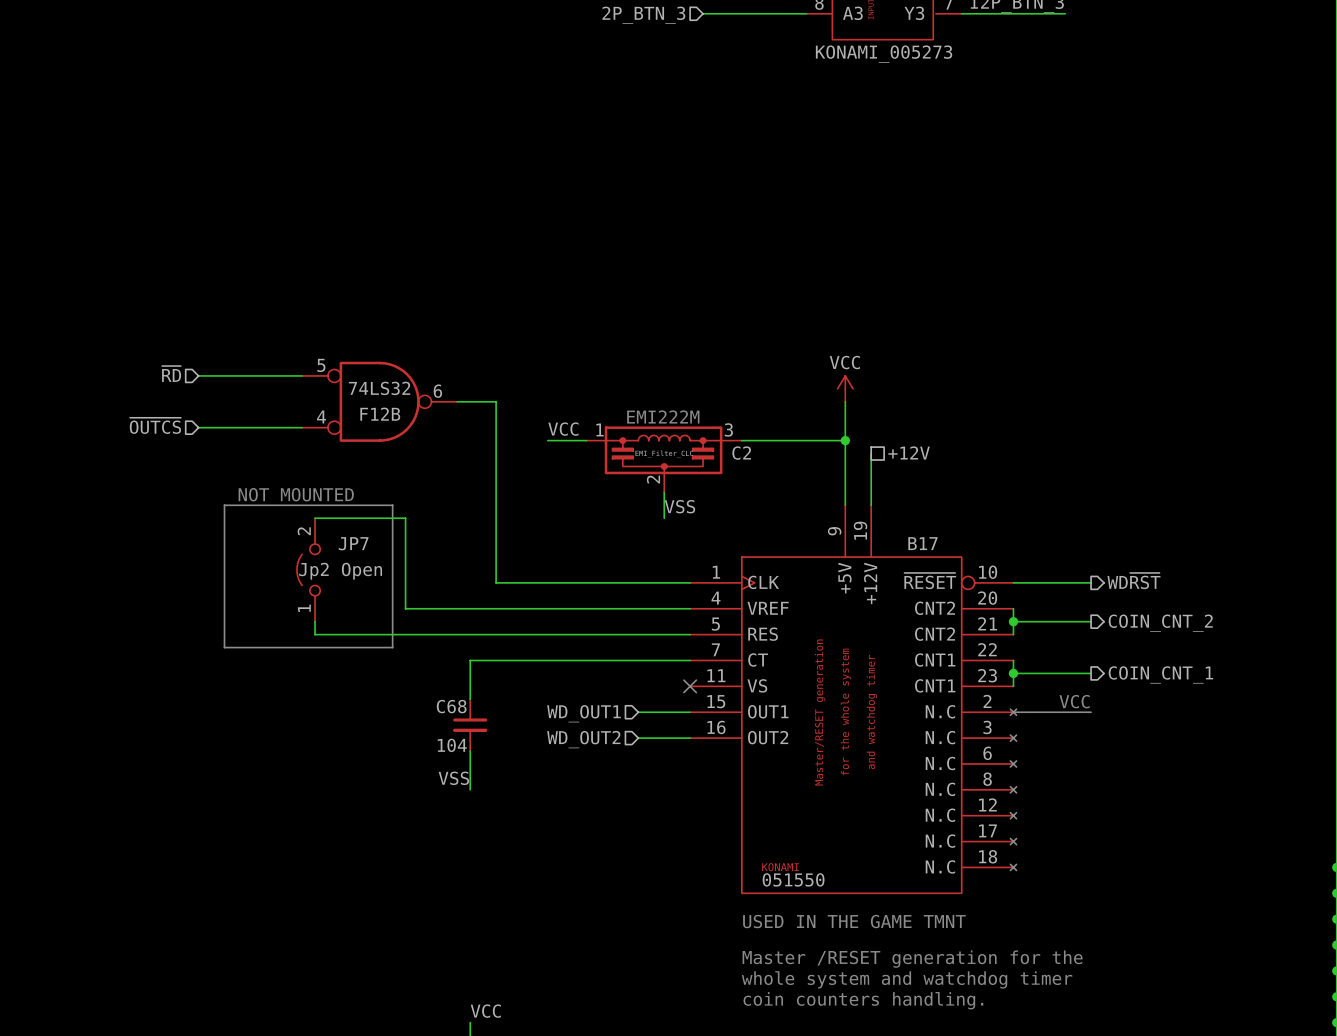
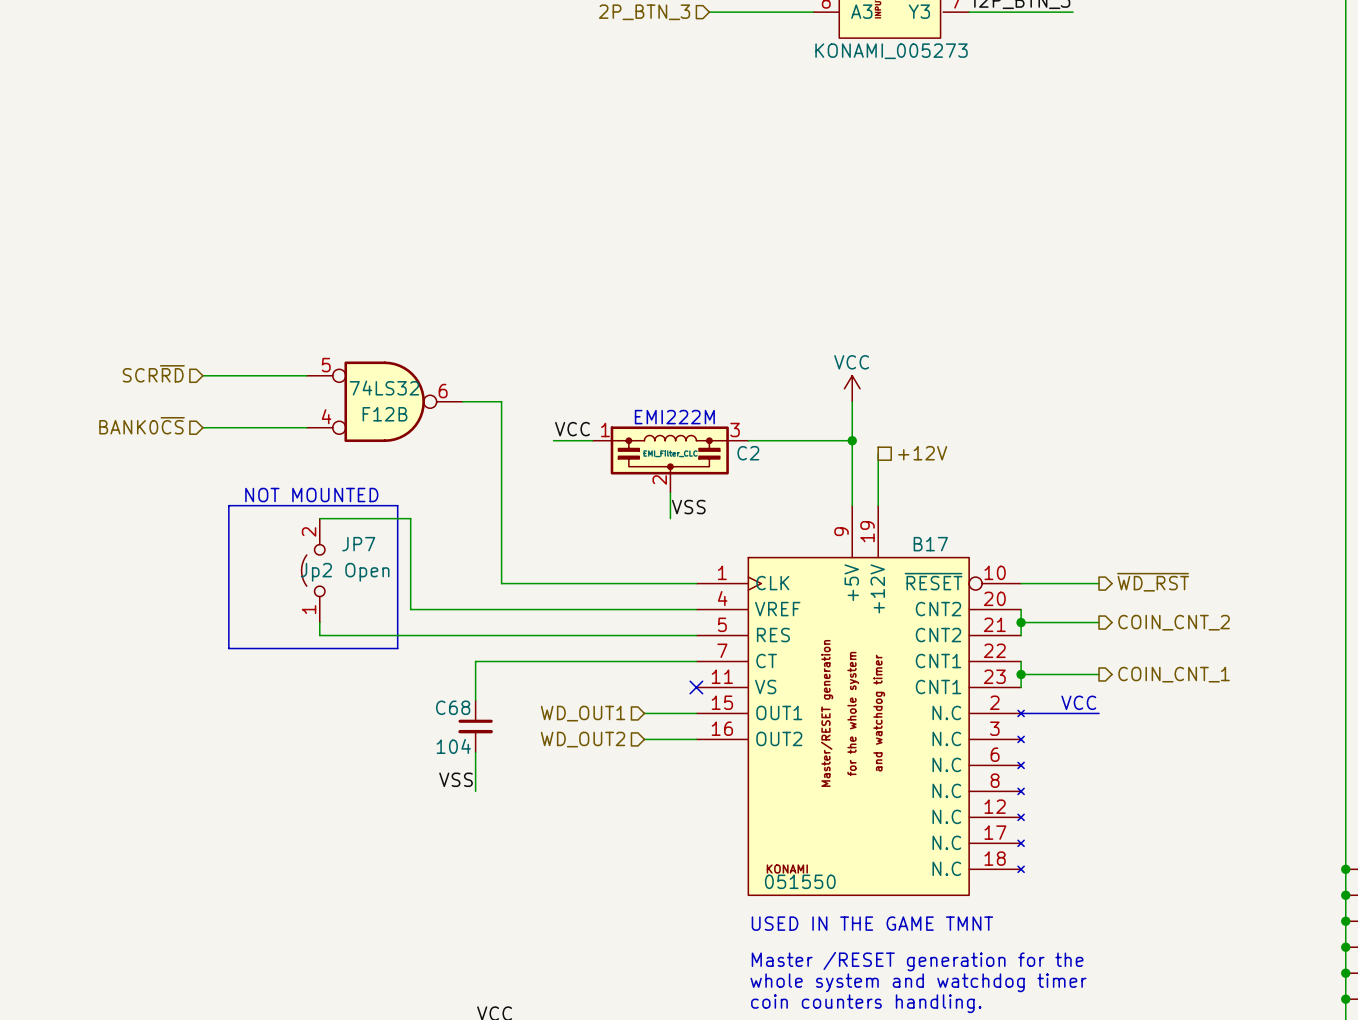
hierarchical label: ~{RD} (171, 373) -> SCR~{RD} (153, 373)
hierarchical label: ~{OUTCS} (155, 425) -> BANK0~{CS} (142, 425)
hierarchical label: WD~{RST} (1133, 581) -> ~{WD_RST} (1153, 582)

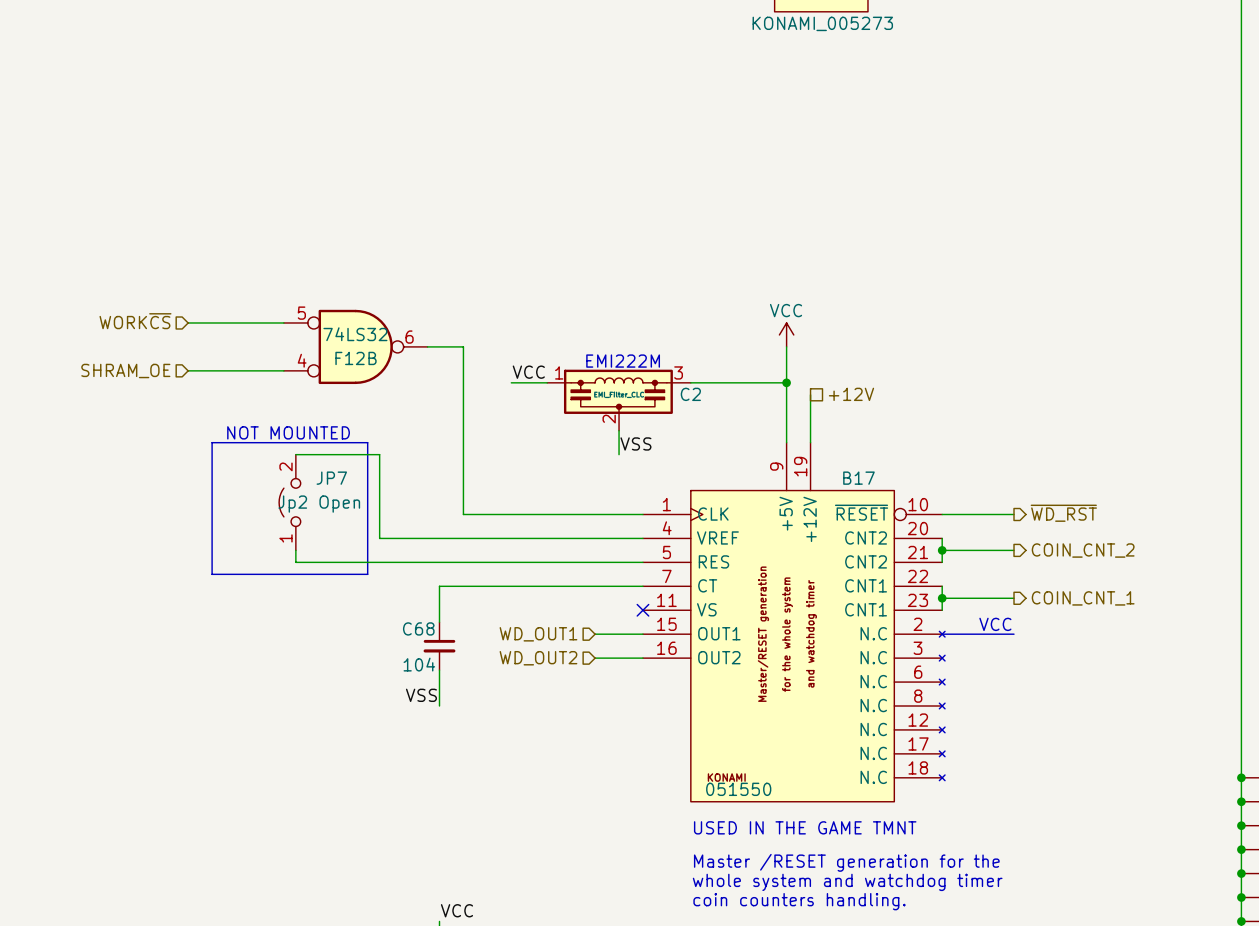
hierarchical label: SCR~{RD} (153, 373) -> WORK~{CS} (135, 321)
hierarchical label: BANK0~{CS} (142, 425) -> SHRAM_OE (125, 370)

